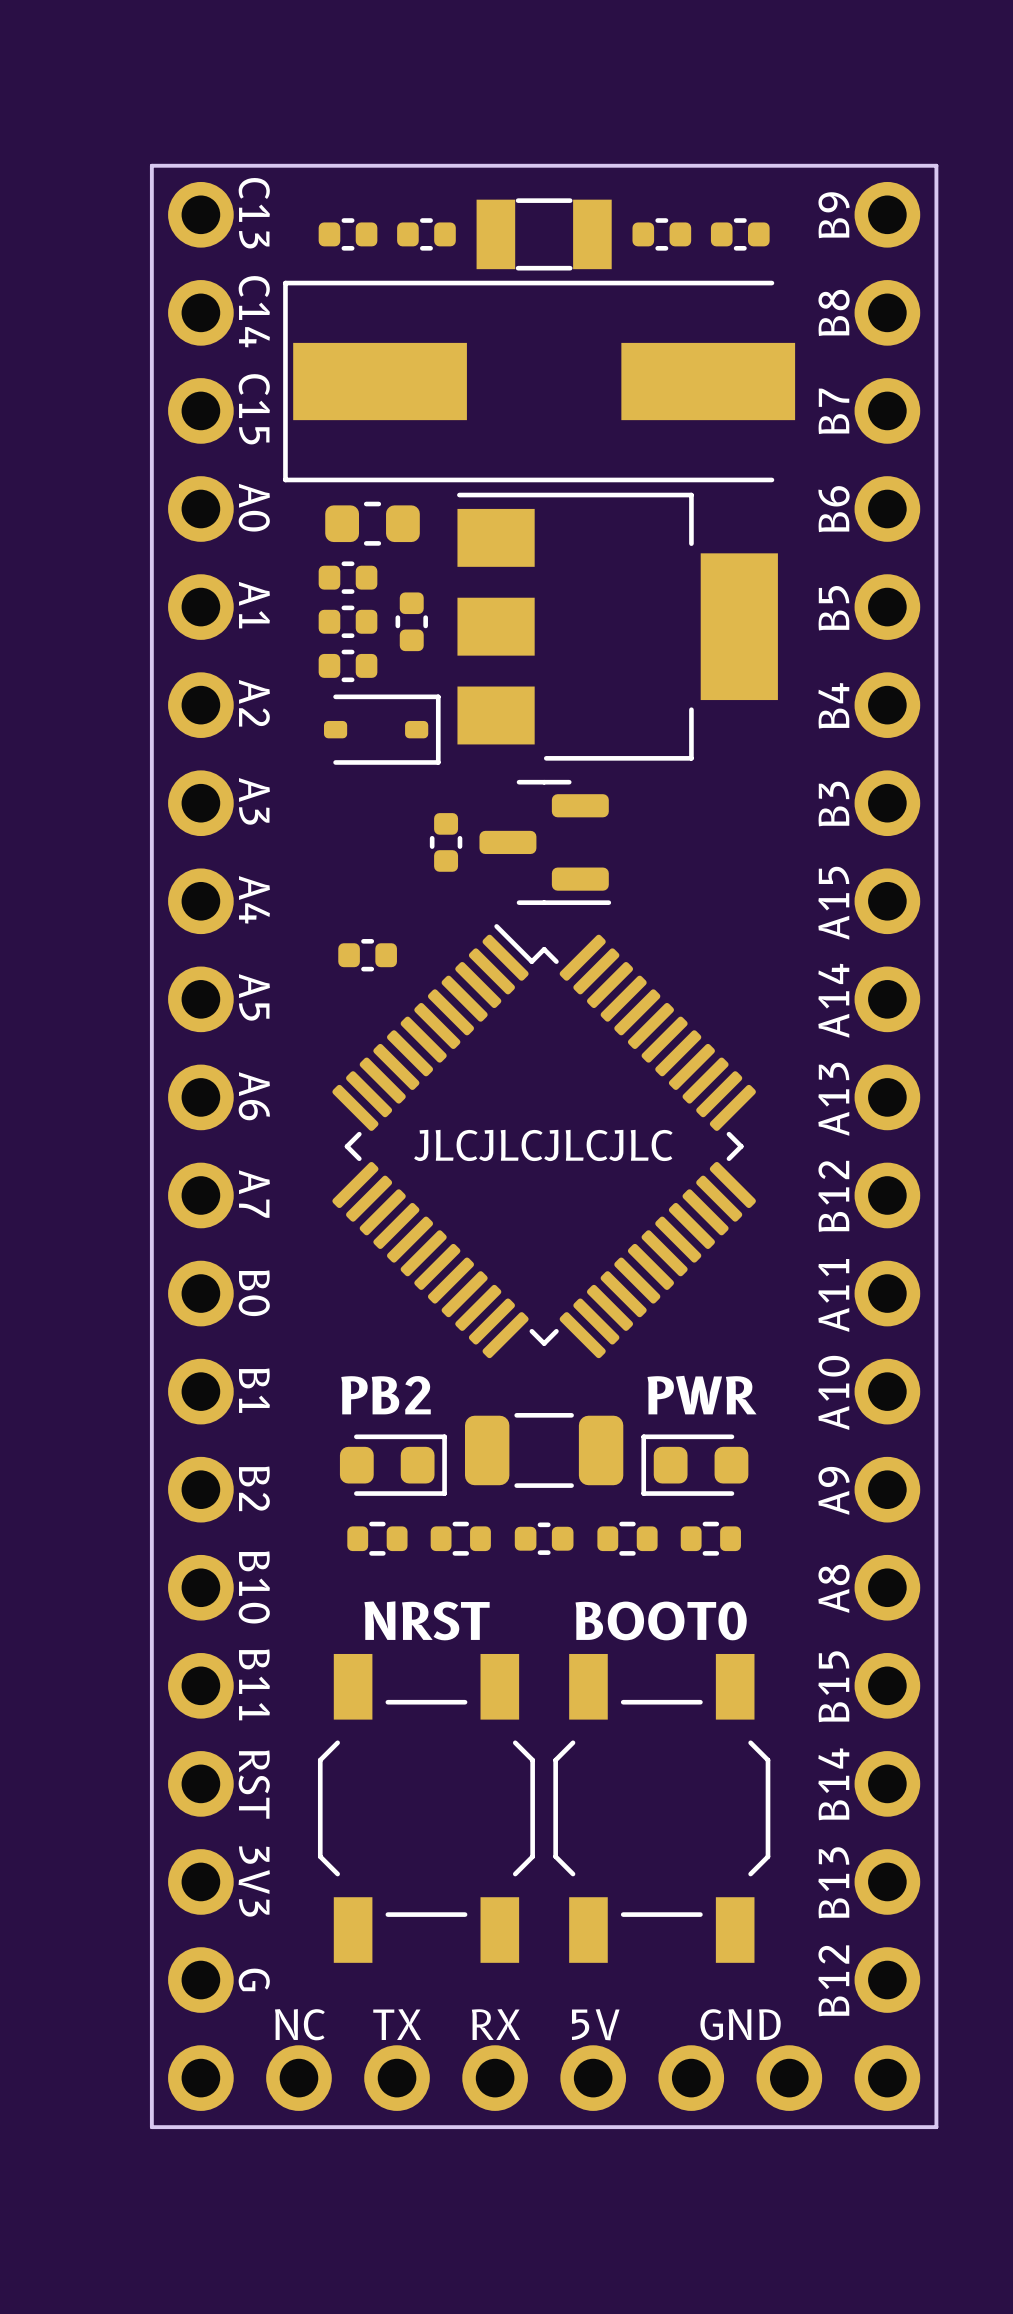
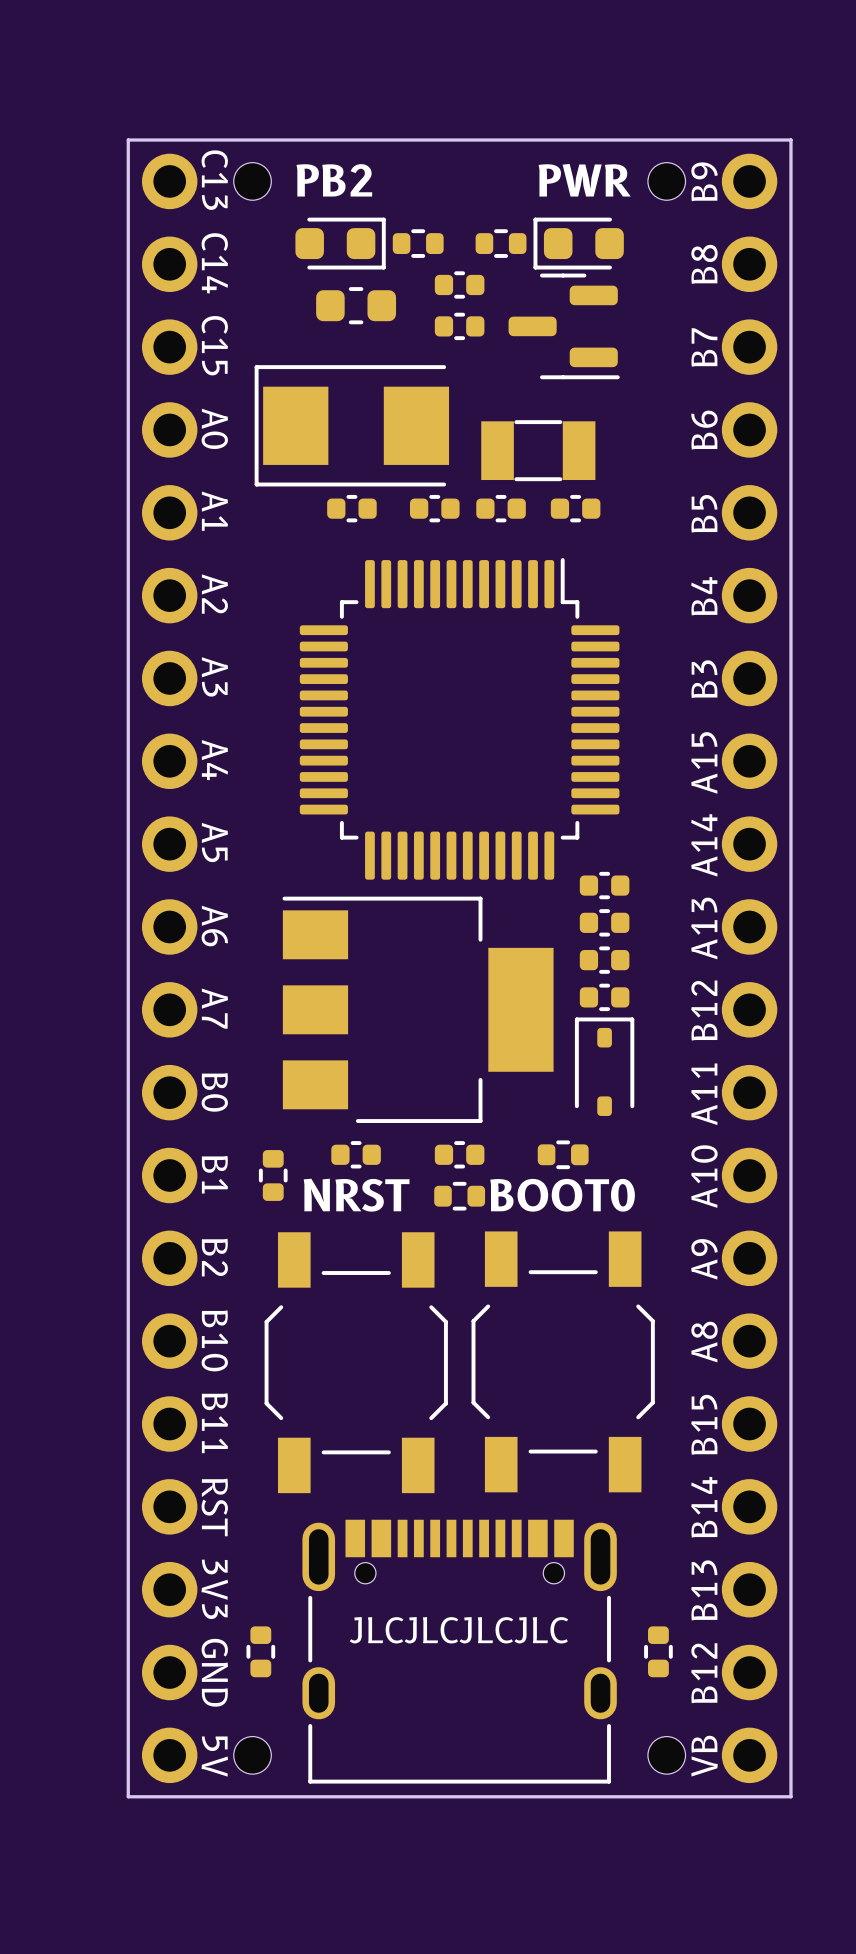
text: none -> PB2 (334, 180)
text: none -> PWR (584, 180)
part: none -> (252, 181)
part: none -> (666, 181)
part: (348, 234) -> none
part: (426, 234) -> none
part position: (544, 234) -> (538, 450)
part: (661, 234) -> none
part: (740, 234) -> none
part footprint: [283, 280, 796, 483] -> [434, 312, 485, 341]
part: none -> (340, 243)
part: none -> (418, 243)
part: none -> (501, 243)
part: none -> (578, 243)
part: none -> (459, 284)
part: none -> (564, 326)
part: none -> (351, 425)
part position: (372, 523) -> (356, 305)
part: (348, 577) -> none
part: none -> (434, 508)
part: none -> (501, 508)
part: none -> (575, 508)
part: (348, 621) -> none
part rotation: 0° (411, 621) -> 90° clockwise (351, 508)
part position: (617, 626) -> (418, 1009)
part: (348, 665) -> none
part rotation: 0° (382, 729) -> 90° counterclockwise (604, 1066)
part position: (382, 729) -> (604, 1066)
part footprint: [479, 779, 612, 905] -> [299, 558, 620, 880]
part: (446, 842) -> none
part: (367, 955) -> none
part: none -> (604, 885)
part: none -> (604, 922)
part: none -> (604, 960)
part: (544, 1141) -> none
text position: JLCJLCJLCJLC (543, 1145) -> JLCJLCJLCJLC (458, 1630)
part: none -> (604, 997)
part: none -> (356, 1154)
part: none -> (459, 1154)
part: none -> (563, 1154)
part: none -> (273, 1175)
text: PB2 (386, 1395) -> none
text: PWR (702, 1395) -> none
part footprint: [464, 1413, 624, 1488] -> [434, 1181, 486, 1211]
part: (393, 1465) -> none
part: (694, 1465) -> none
part: (377, 1538) -> none
part: (460, 1538) -> none
part: (544, 1538) -> none
part: (627, 1538) -> none
part: (710, 1538) -> none
part: none -> (563, 1361)
part: none -> (356, 1362)
text position: NRST (427, 1620) -> NRST (356, 1195)
text position: BOOT0 (661, 1620) -> BOOT0 (562, 1195)
part: (426, 1808) -> none
part: (661, 1808) -> none
part: none -> (260, 1651)
part: none -> (459, 1651)
part: none -> (658, 1651)
text: G (254, 1979) -> GND (214, 1672)
text: NC (299, 2024) -> none
text: TX (397, 2024) -> none
text: RX (496, 2024) -> none
text rotation: 0° (595, 2024) -> 90° clockwise (214, 1756)
text position: 5V (595, 2024) -> 5V (214, 1756)
text: GND (740, 2024) -> none
part: none -> (252, 1755)
part: (544, 2078) -> none
part: none -> (666, 1755)
text: none -> VB (704, 1756)

